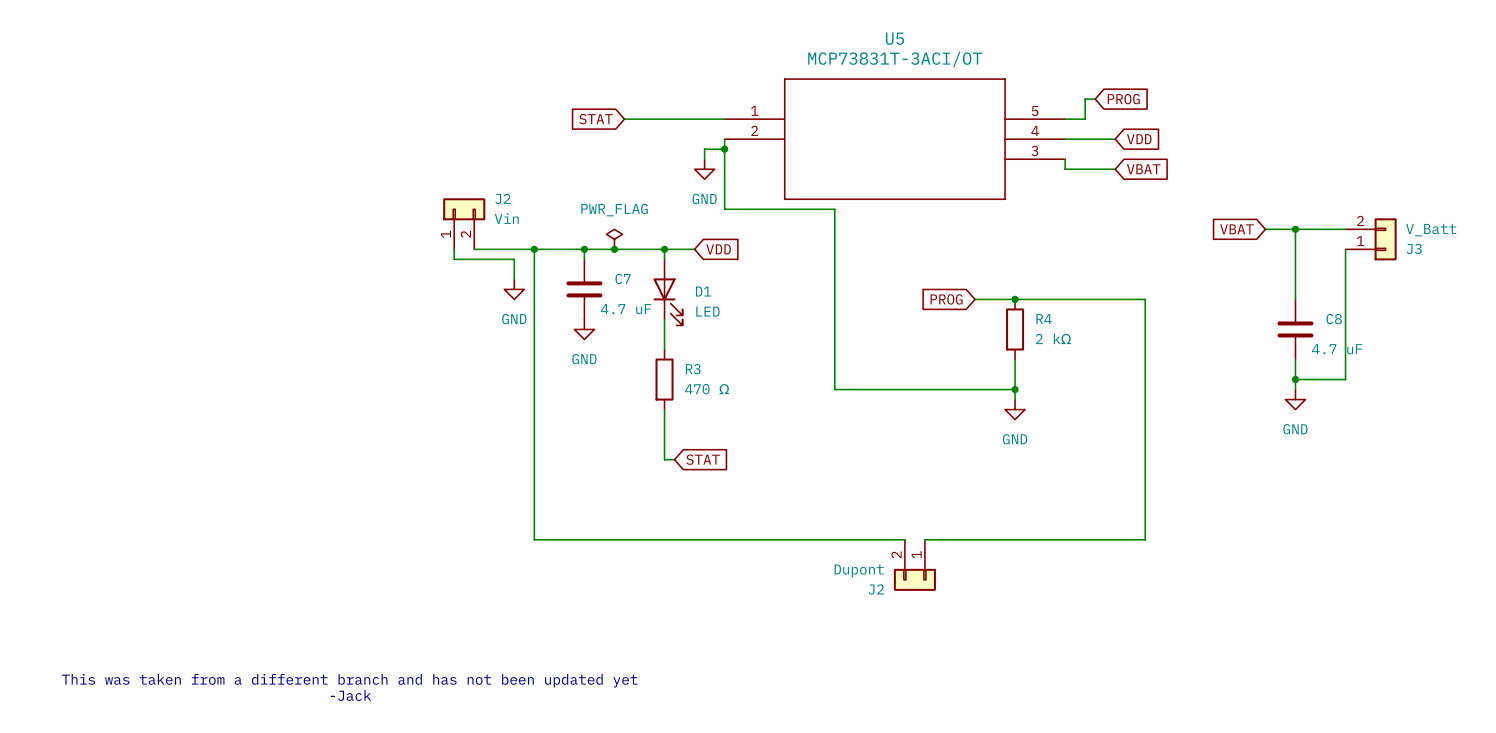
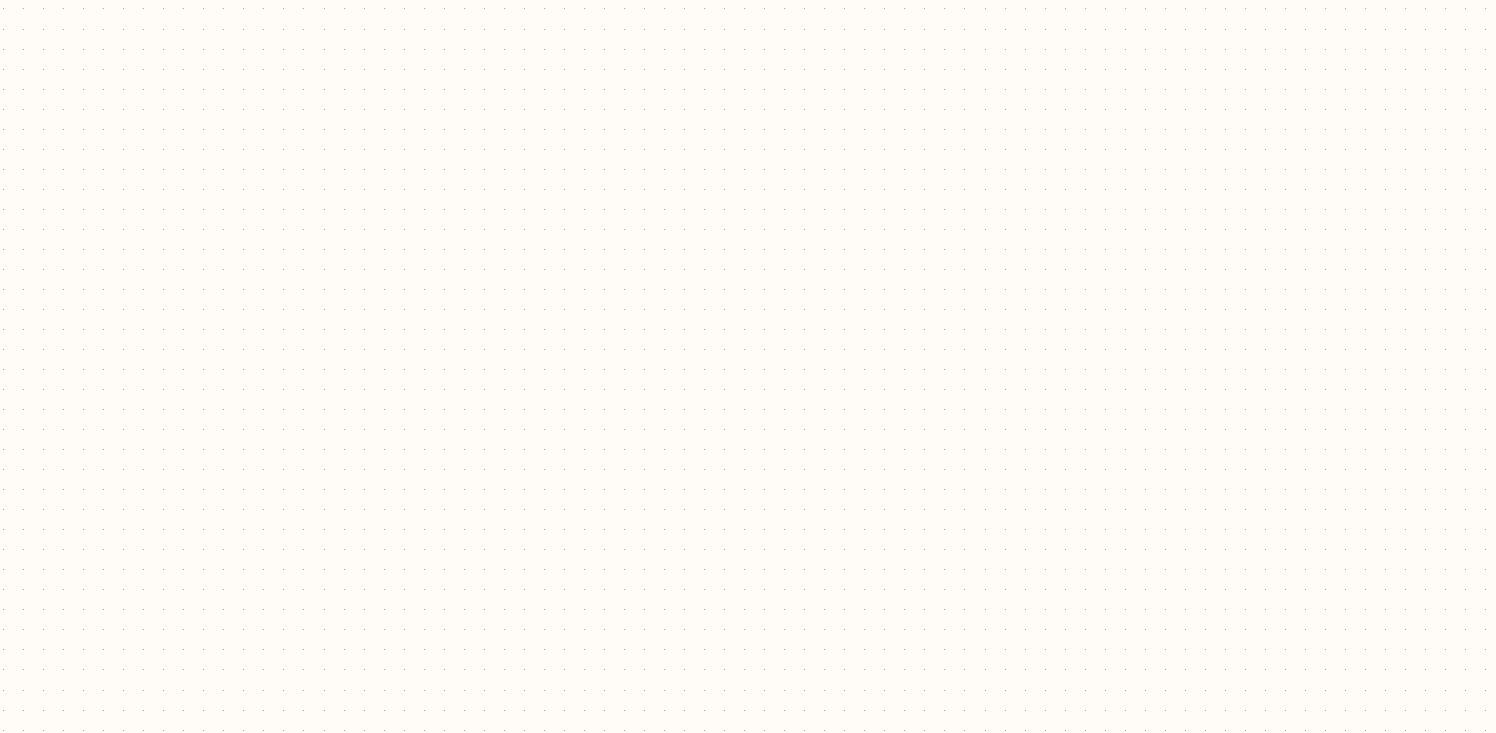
wire: (1095, 99) (1085, 99) (1085, 119) (1065, 119) -> none
global label: PROG (1123, 99) -> none
global label: STAT (596, 119) -> none
wire: (624, 119) (724, 119) -> none
wire: (724, 139) (724, 209) (834, 209) (834, 389) (1015, 389) -> none
U5: MCP73831T-3ACI/OT (894, 139) -> none
wire: (1065, 139) (1115, 139) -> none
global label: VDD (1139, 139) -> none
wire: (724, 149) (704, 149) (704, 159) -> none
junction: (724, 149) -> none
wire: (1065, 159) (1065, 169) (1115, 169) -> none
power symbol: GND (704, 169) -> none
global label: VBAT (1143, 169) -> none
J2: Vin (464, 223) -> none
global label: VBAT (1237, 229) -> none
wire: (1265, 229) (1345, 229) -> none
wire: (1295, 229) (1295, 299) -> none
junction: (1295, 229) -> none
power symbol: PWR_FLAG (614, 239) -> none
J3: V_Batt (1371, 239) -> none
wire: (454, 249) (454, 259) (514, 259) (514, 279) -> none
wire: (474, 249) (694, 249) -> none
wire: (534, 249) (534, 539) (904, 539) -> none
junction: (534, 249) -> none
wire: (584, 249) (584, 259) -> none
junction: (584, 249) -> none
junction: (614, 249) -> none
wire: (664, 249) (664, 259) -> none
junction: (664, 249) -> none
global label: VDD (718, 249) -> none
wire: (1345, 249) (1345, 379) (1295, 379) -> none
power symbol: GND (514, 289) -> none
C7: 4.7 uF (584, 289) -> none
D1: LED (668, 292) -> none
global label: PROG (946, 299) -> none
wire: (975, 299) (1145, 299) (1145, 539) (924, 539) -> none
junction: (1015, 299) -> none
wire: (664, 319) (664, 349) -> none
power symbol: GND (584, 329) -> none
R4: 2 kΩ (1015, 329) -> none
C8: 4.7 uF (1295, 329) -> none
wire: (1015, 359) (1015, 399) -> none
wire: (1295, 359) (1295, 389) -> none
R3: 470 Ω (664, 379) -> none
junction: (1295, 379) -> none
junction: (1015, 389) -> none
power symbol: GND (1295, 399) -> none
wire: (664, 409) (664, 459) (674, 459) -> none
power symbol: GND (1015, 409) -> none
global label: STAT (703, 459) -> none
J2: Dupont (914, 565) -> none
text: This was taken from a different branch and has not been updated yet (349, 680) -> none
text: -Jack (350, 695) -> none

